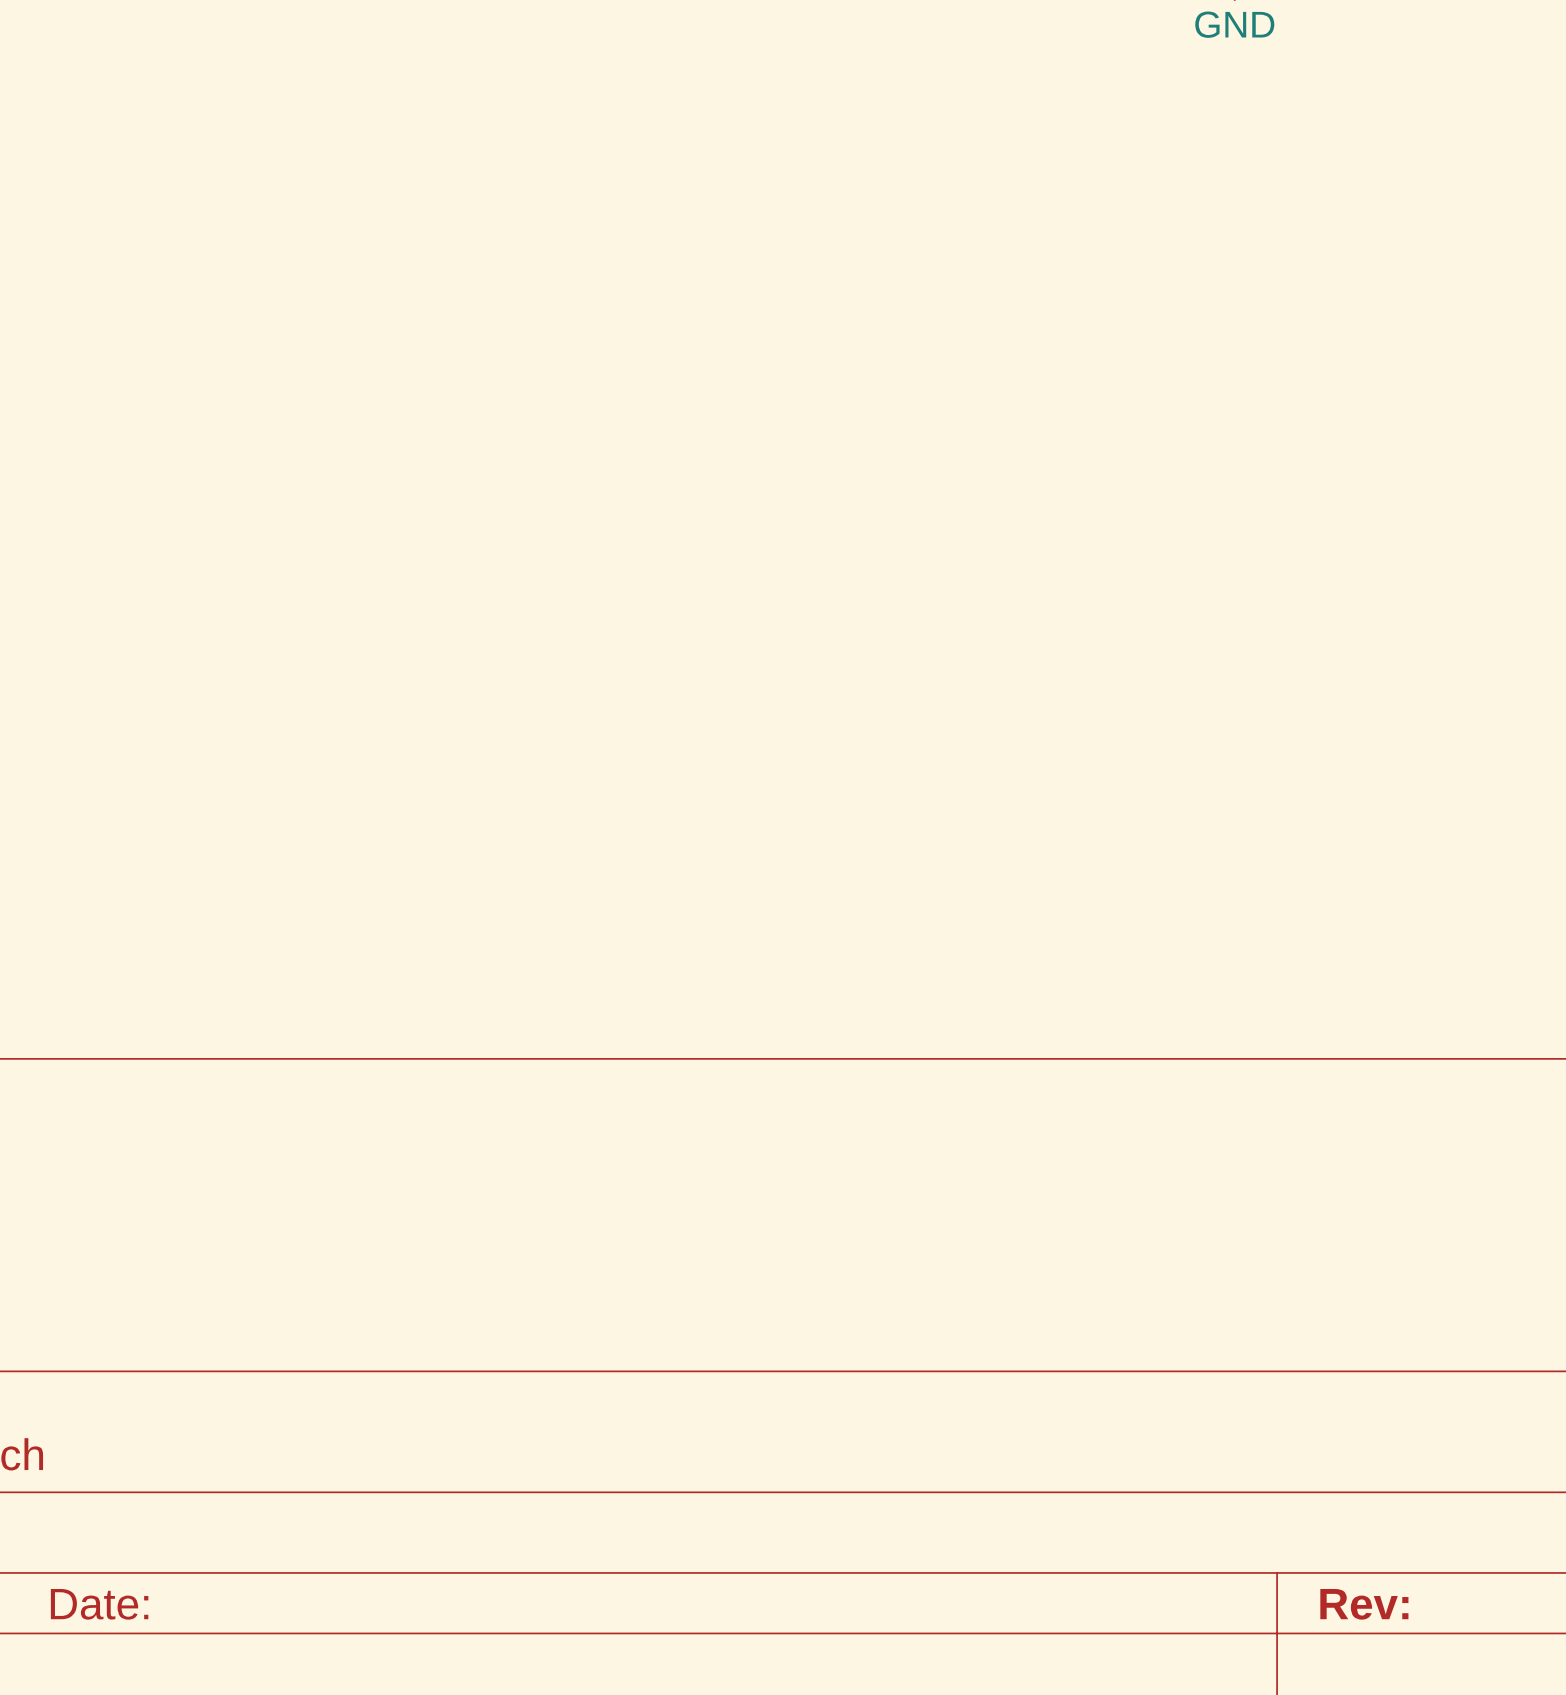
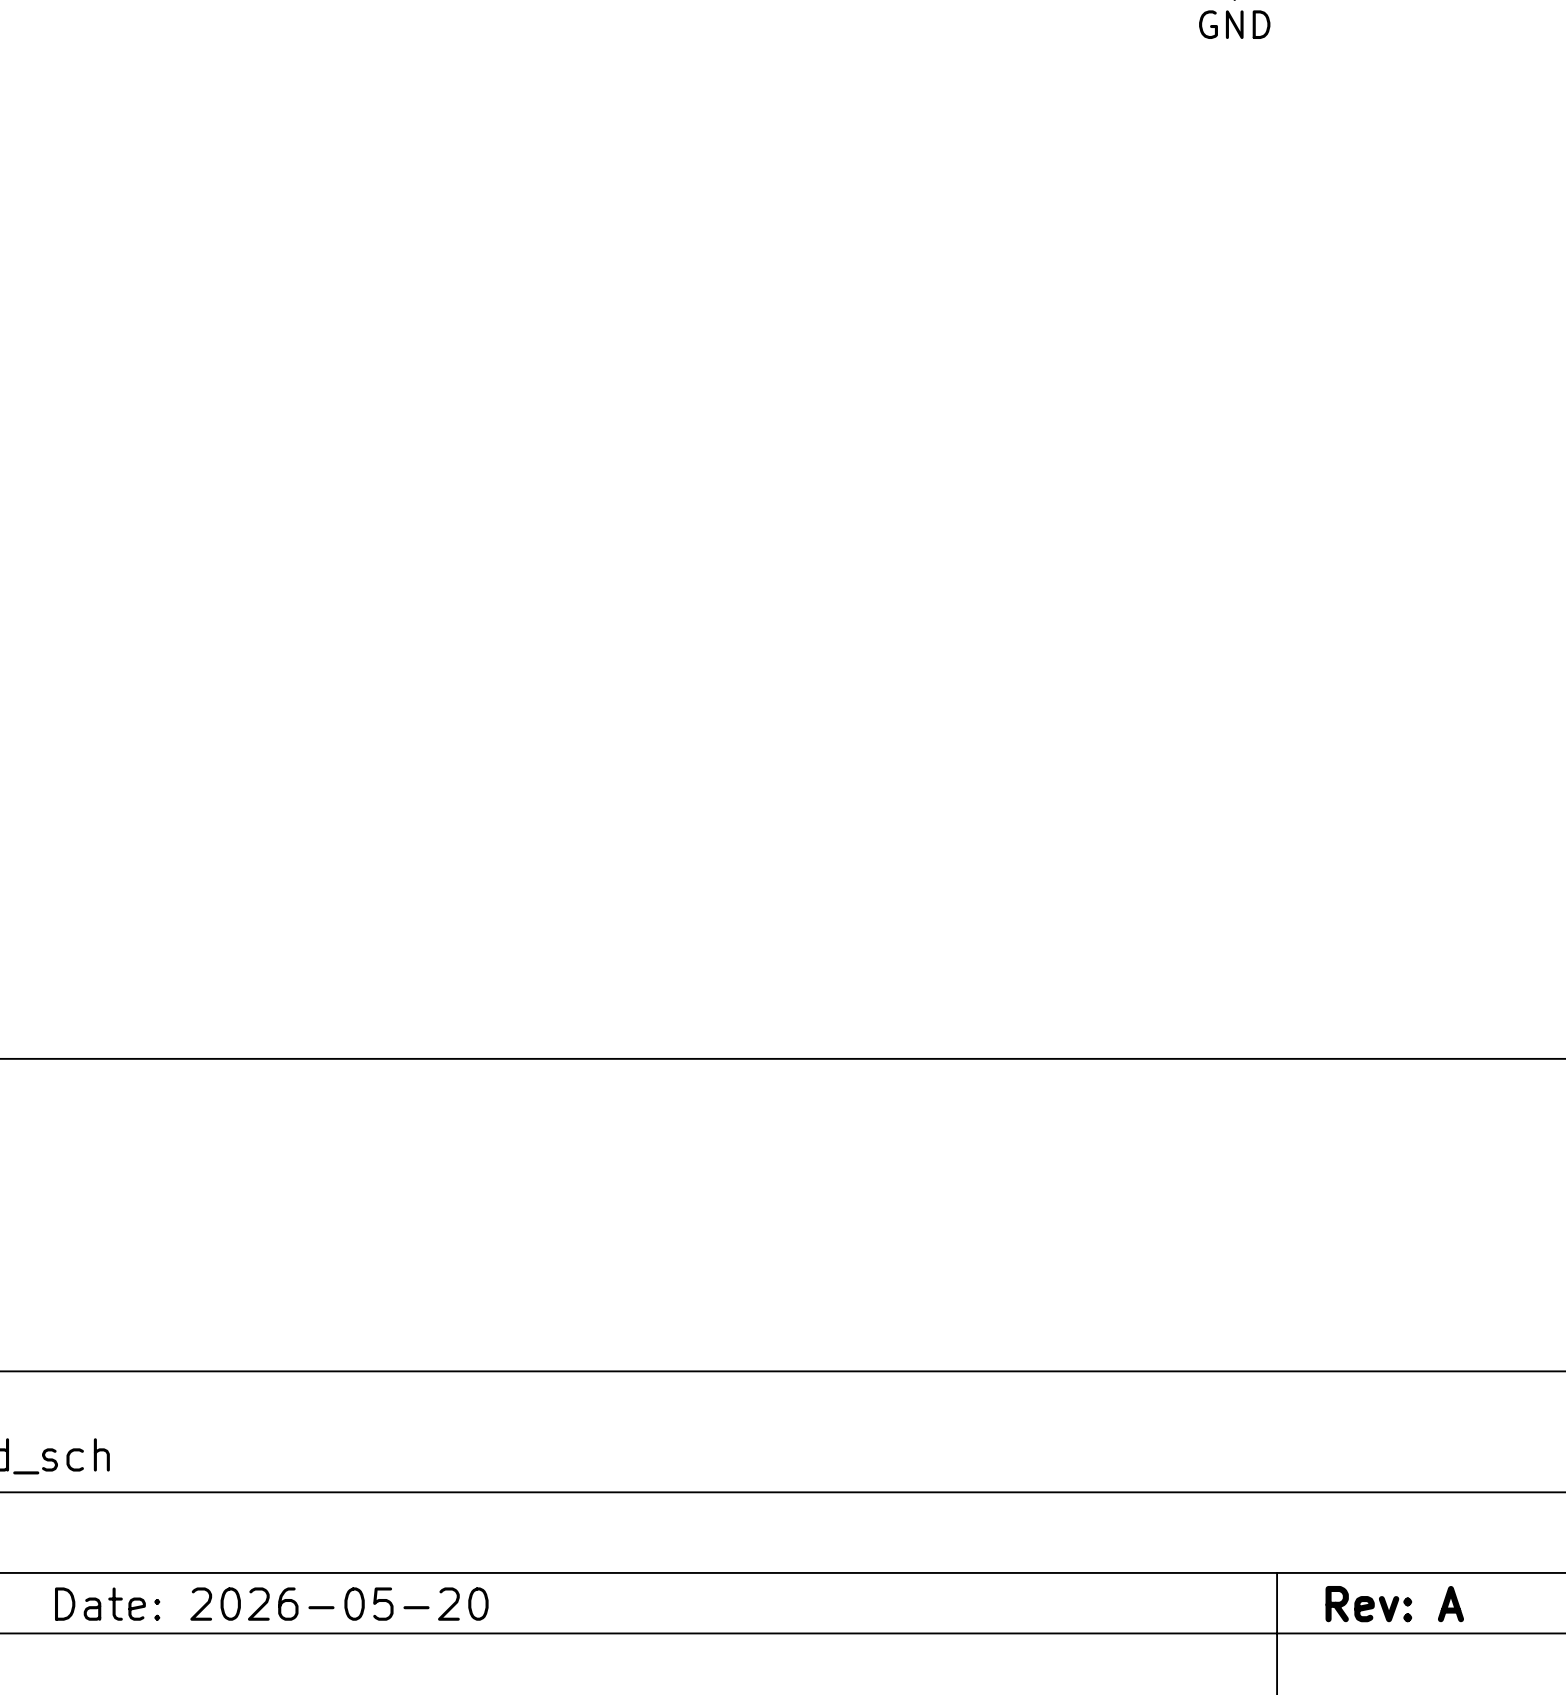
title block: Date: (99, 1604) -> Date: 2026-05-20 (271, 1604)
title block: Rev: (1364, 1604) -> Rev: A (1394, 1604)

